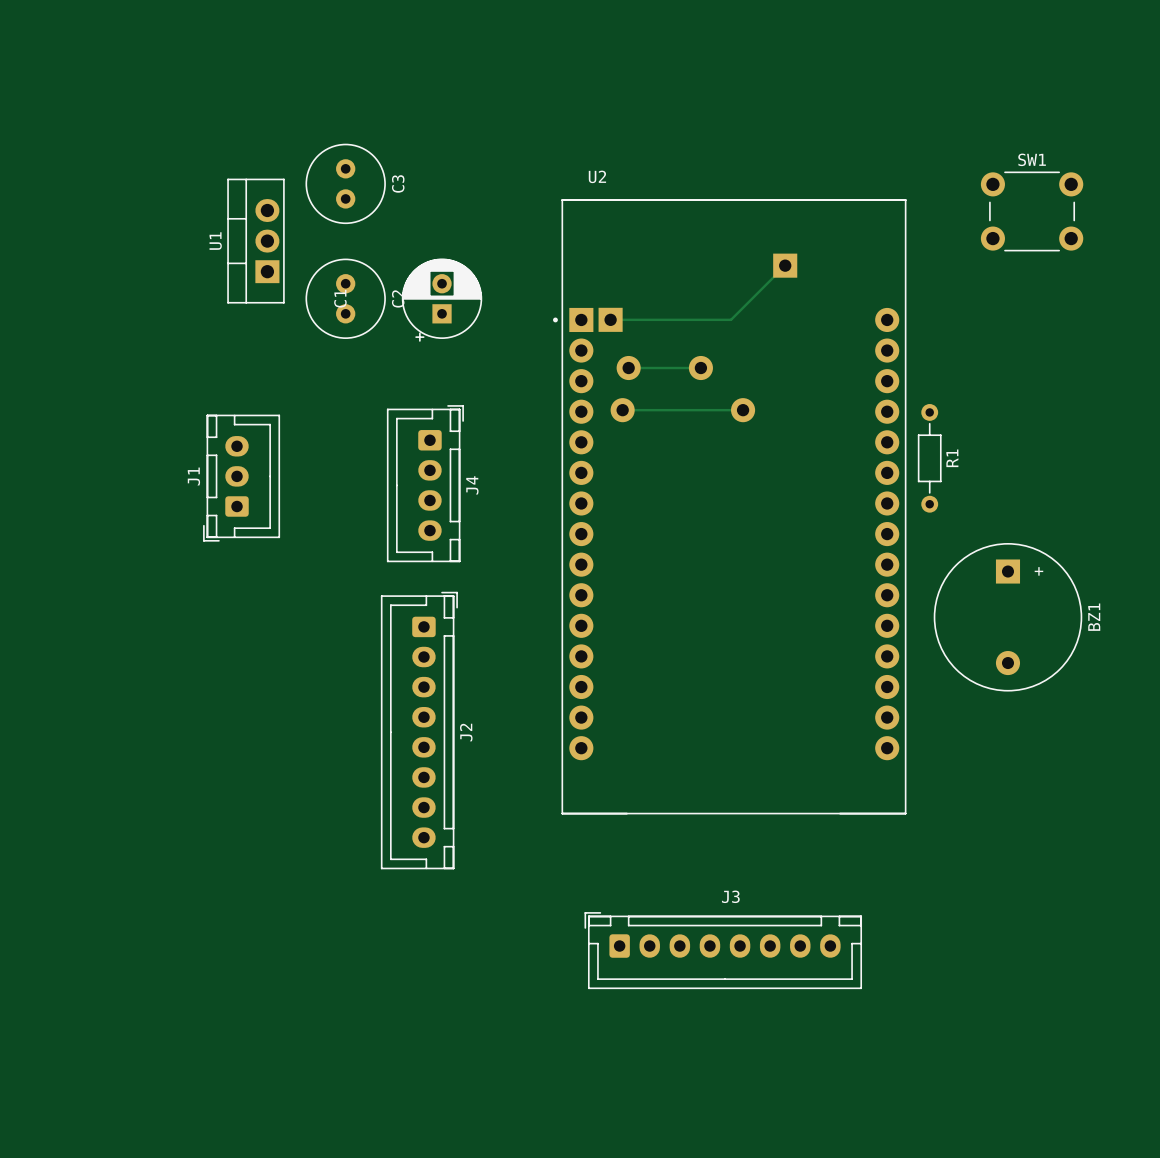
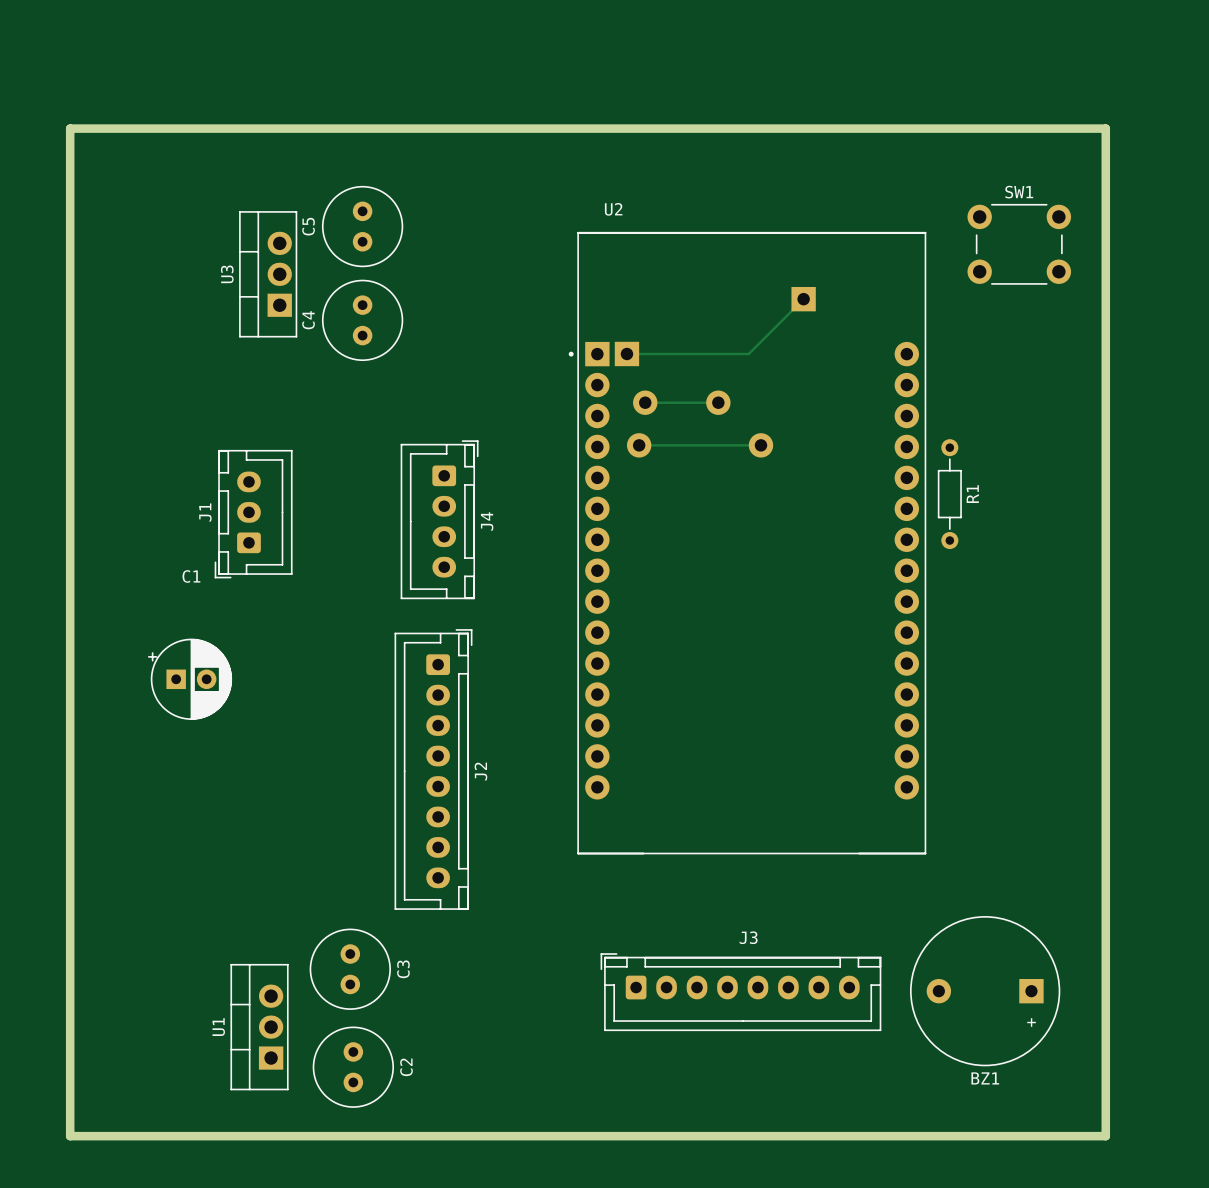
board edge: none -> (70, 128) (1105, 128) (1105, 1136) (70, 1136) (70, 128)
C3 position: (345, 183) -> (350, 969)
C5: none -> (362, 226)
SW1 position: (1032, 211) -> (1019, 244)
U1 name: U1 (215, 241) -> U3 (227, 274)
C4: none -> (362, 320)
C2 position: (345, 298) -> (353, 1067)
C1 rotation: 0° (442, 300) -> 90° clockwise (190, 679)
C1 position: (442, 300) -> (190, 679)
BZ1 rotation: 0° (1007, 617) -> 90° clockwise (985, 991)
BZ1 position: (1007, 617) -> (985, 991)
U1: none -> (259, 1027)

